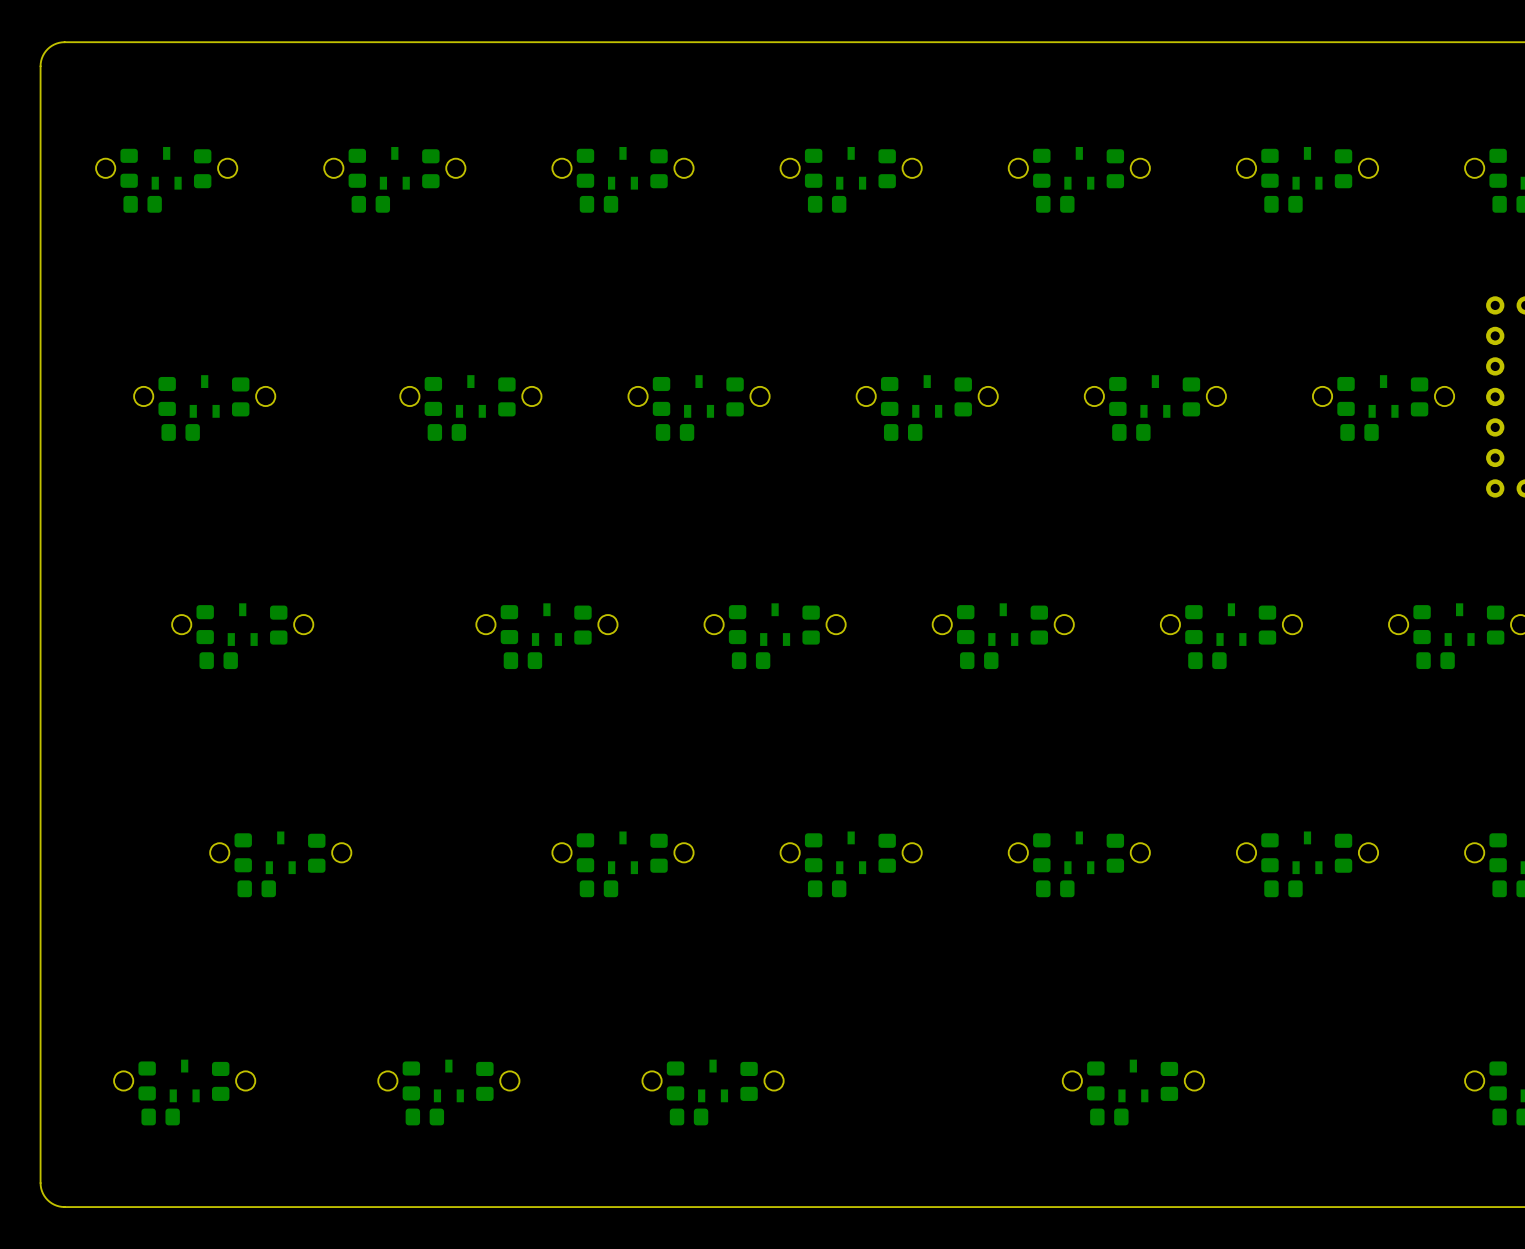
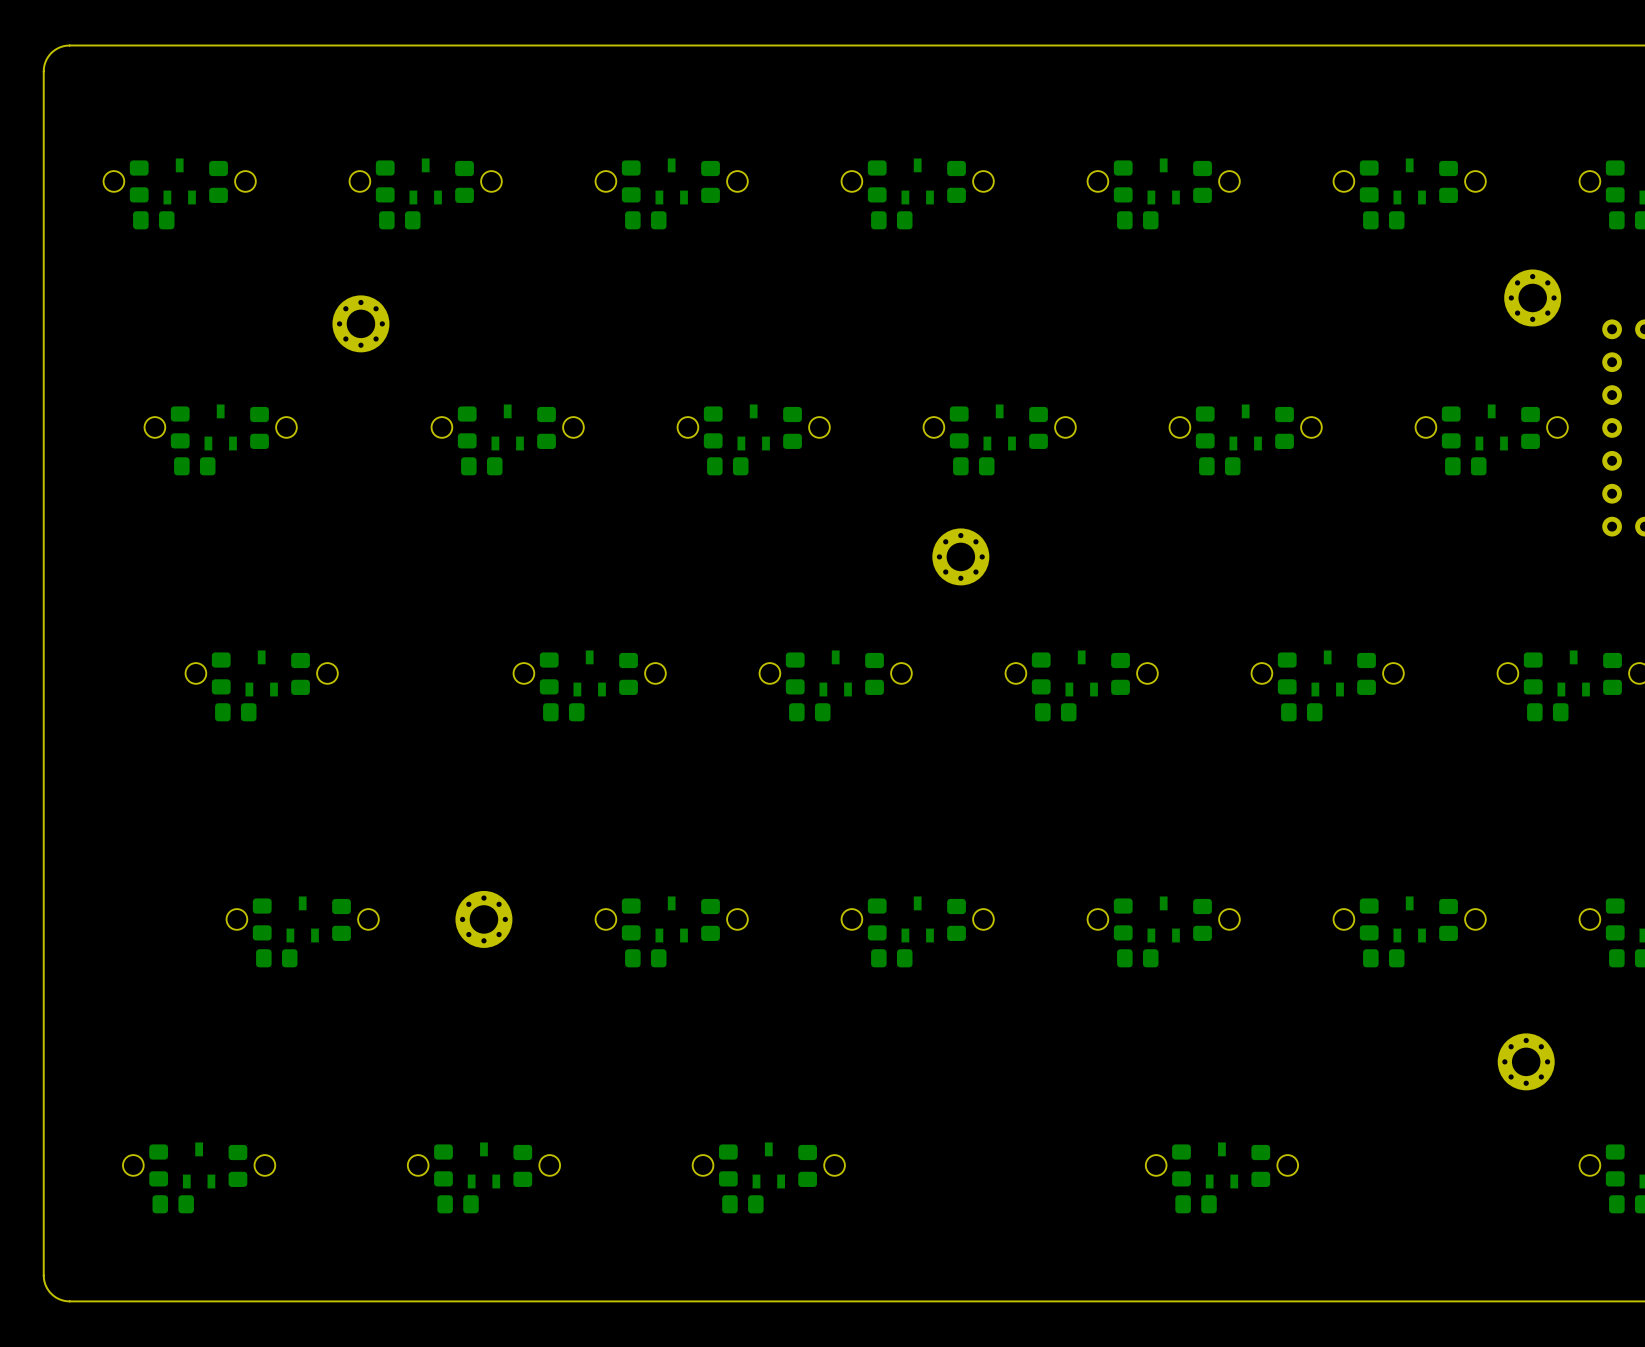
part: none -> (1532, 297)
part: none -> (360, 323)
part: none -> (960, 556)
part: none -> (483, 919)
part: none -> (1526, 1061)

